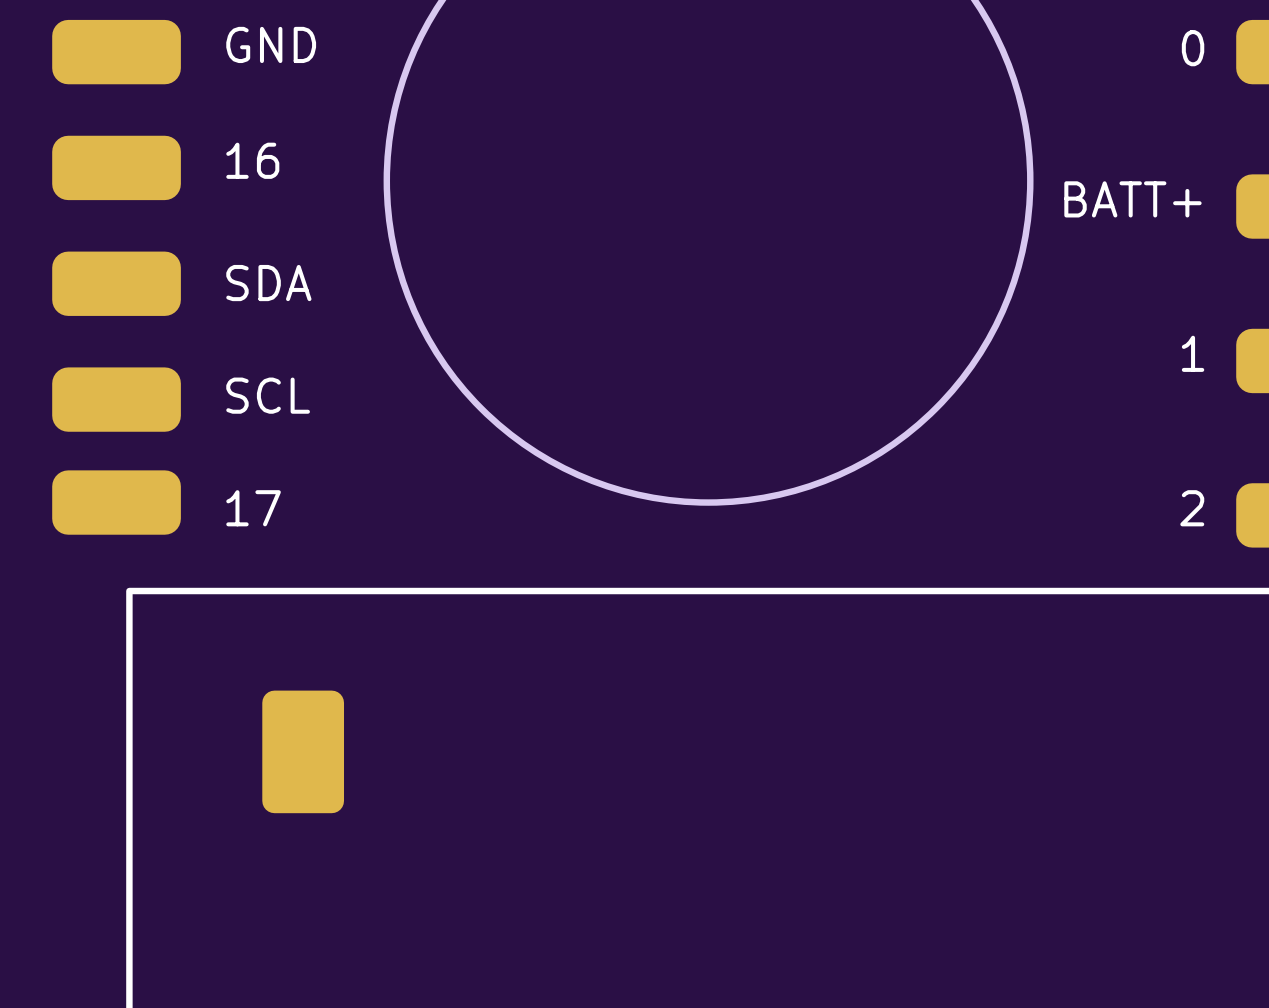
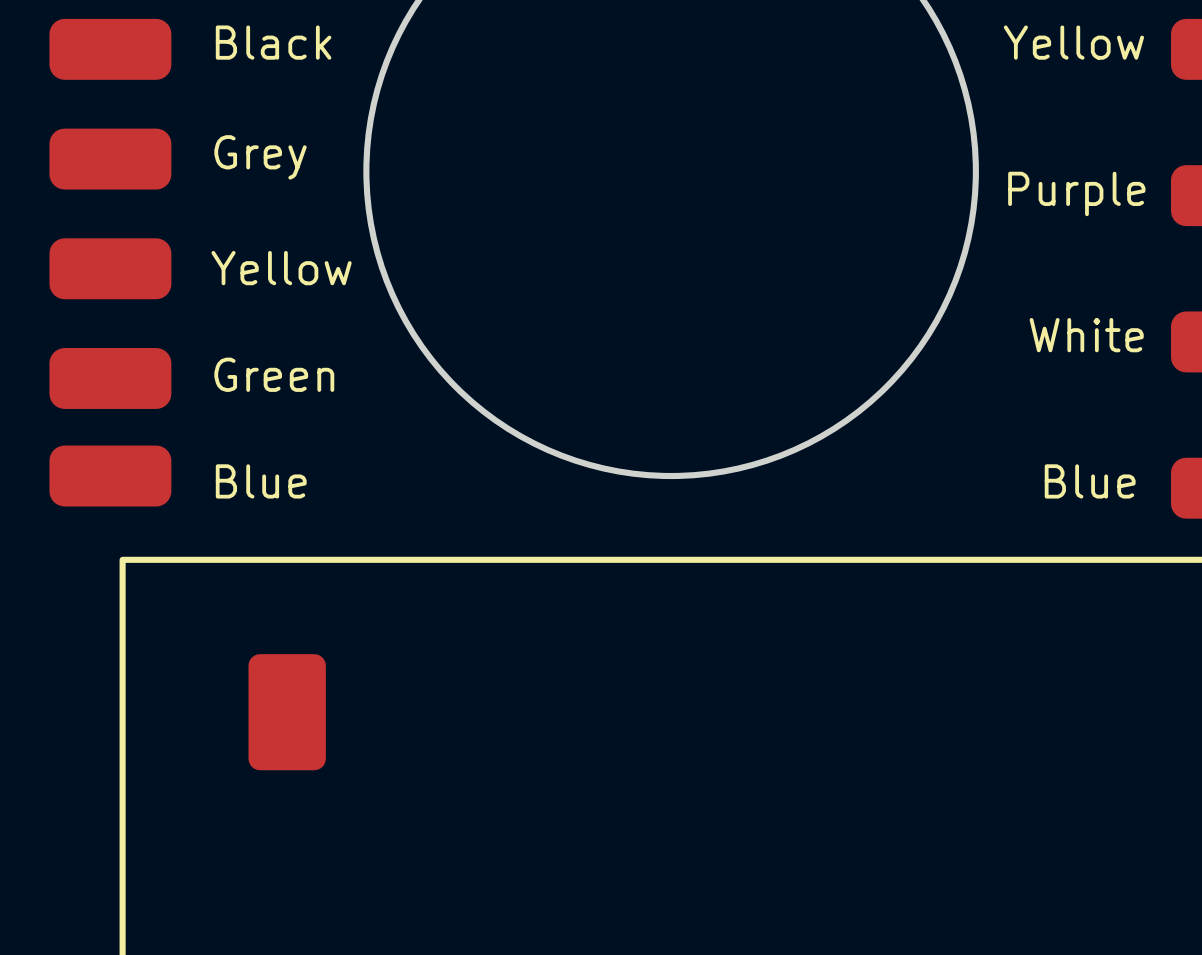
text: GND (271, 44) -> Black (273, 42)
text: none -> Yellow (1073, 42)
text: 0 (1193, 48) -> none
text: 16 (252, 160) -> Grey (260, 157)
text: BATT+ (1132, 199) -> Purple (1076, 193)
text: SDA (268, 283) -> Yellow (281, 268)
text: none -> White (1086, 335)
text: 1 (1193, 353) -> none
text: SCL (268, 395) -> Green (274, 374)
text: 17 (253, 508) -> Blue (261, 481)
text: none -> Blue (1090, 481)
text: 2 (1192, 508) -> none

